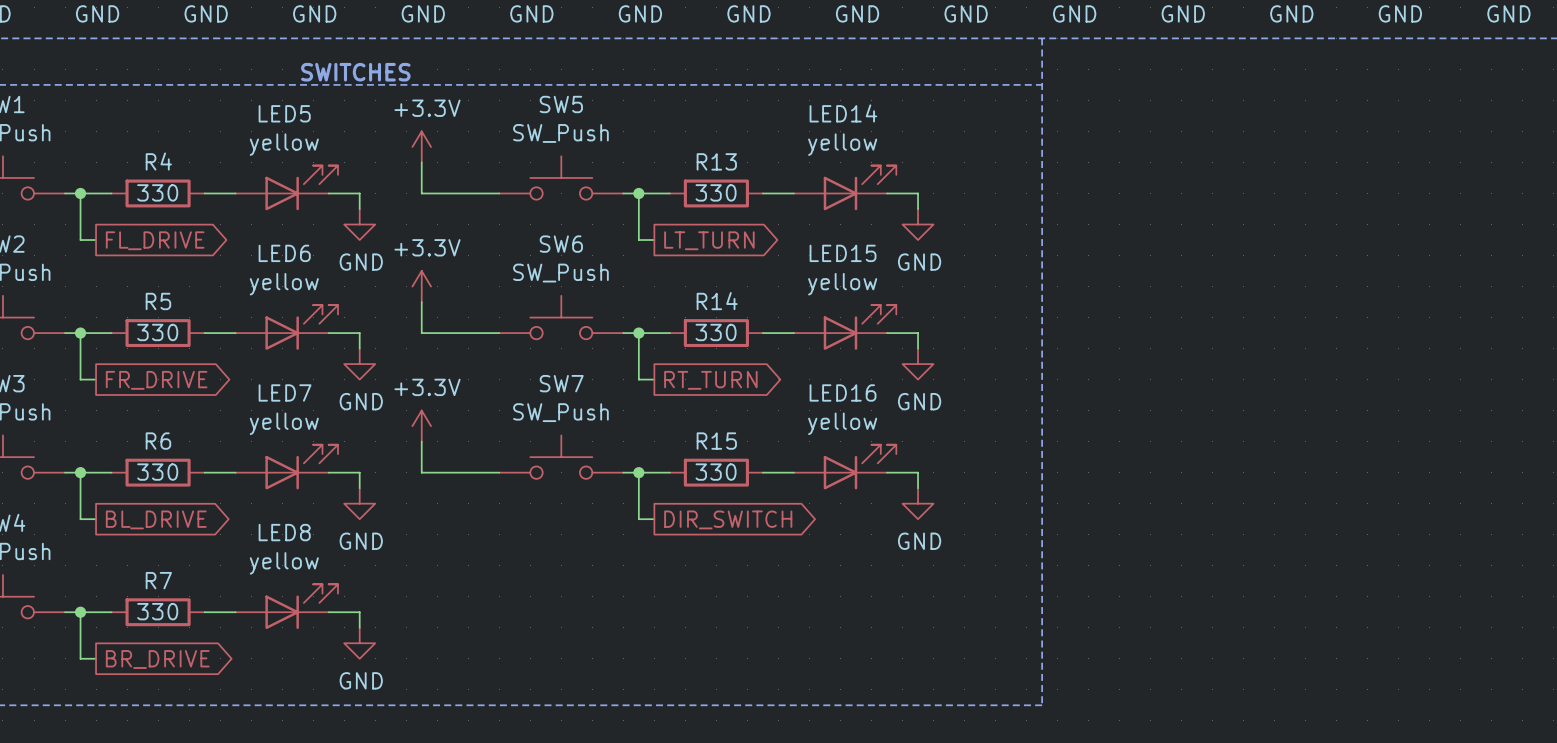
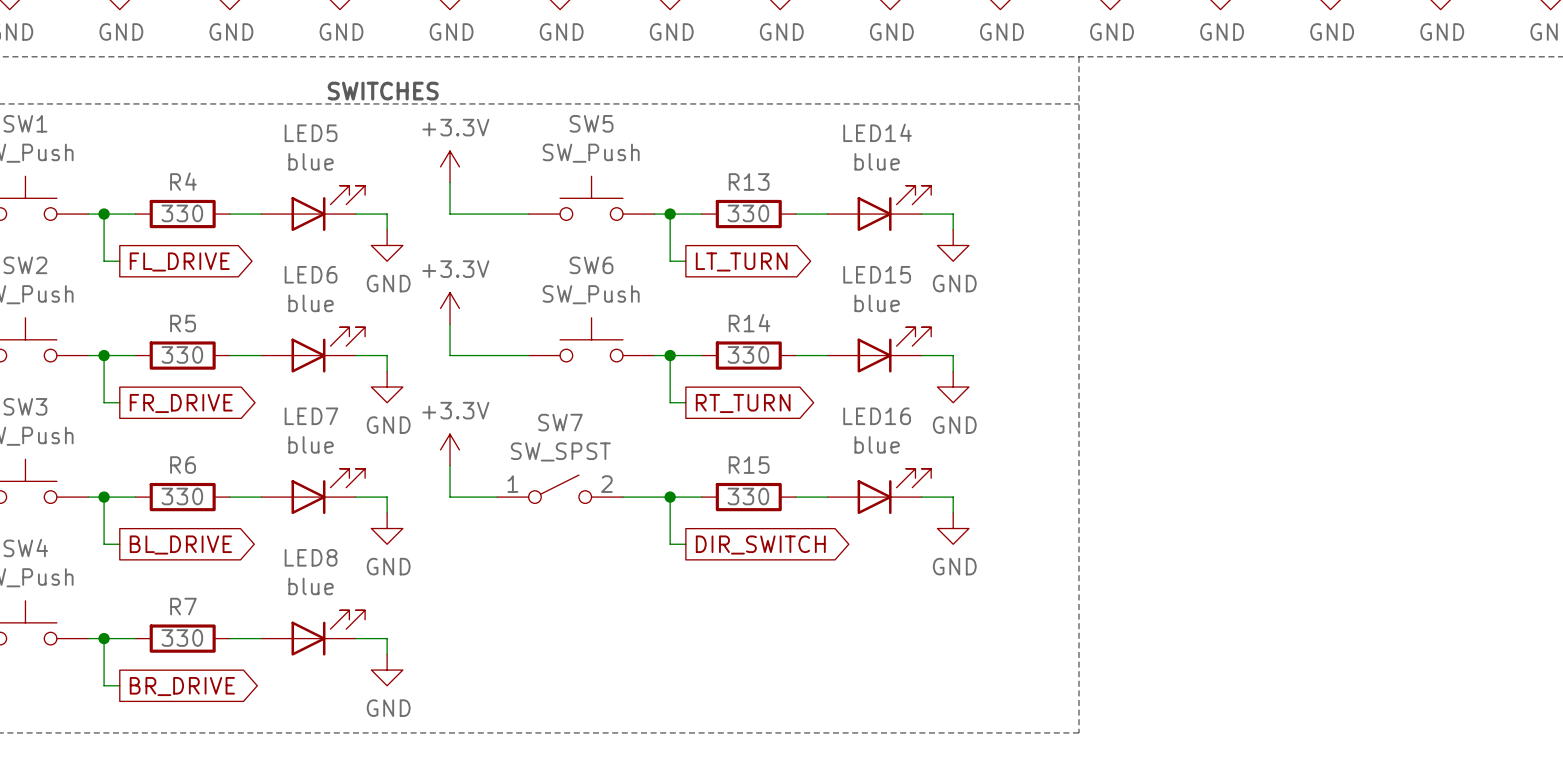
LED5 value: yellow (284, 144) -> blue (311, 161)
LED14 value: yellow (842, 144) -> blue (877, 161)
LED6 value: yellow (284, 284) -> blue (311, 303)
LED15 value: yellow (842, 284) -> blue (877, 303)
SW7 value: SW_Push (560, 412) -> SW_SPST (560, 451)
LED7 value: yellow (284, 423) -> blue (311, 444)
LED16 value: yellow (842, 423) -> blue (877, 444)
SW7 symbol: [499, 435, 624, 479] -> [497, 475, 623, 504]
LED8 value: yellow (284, 563) -> blue (311, 586)

